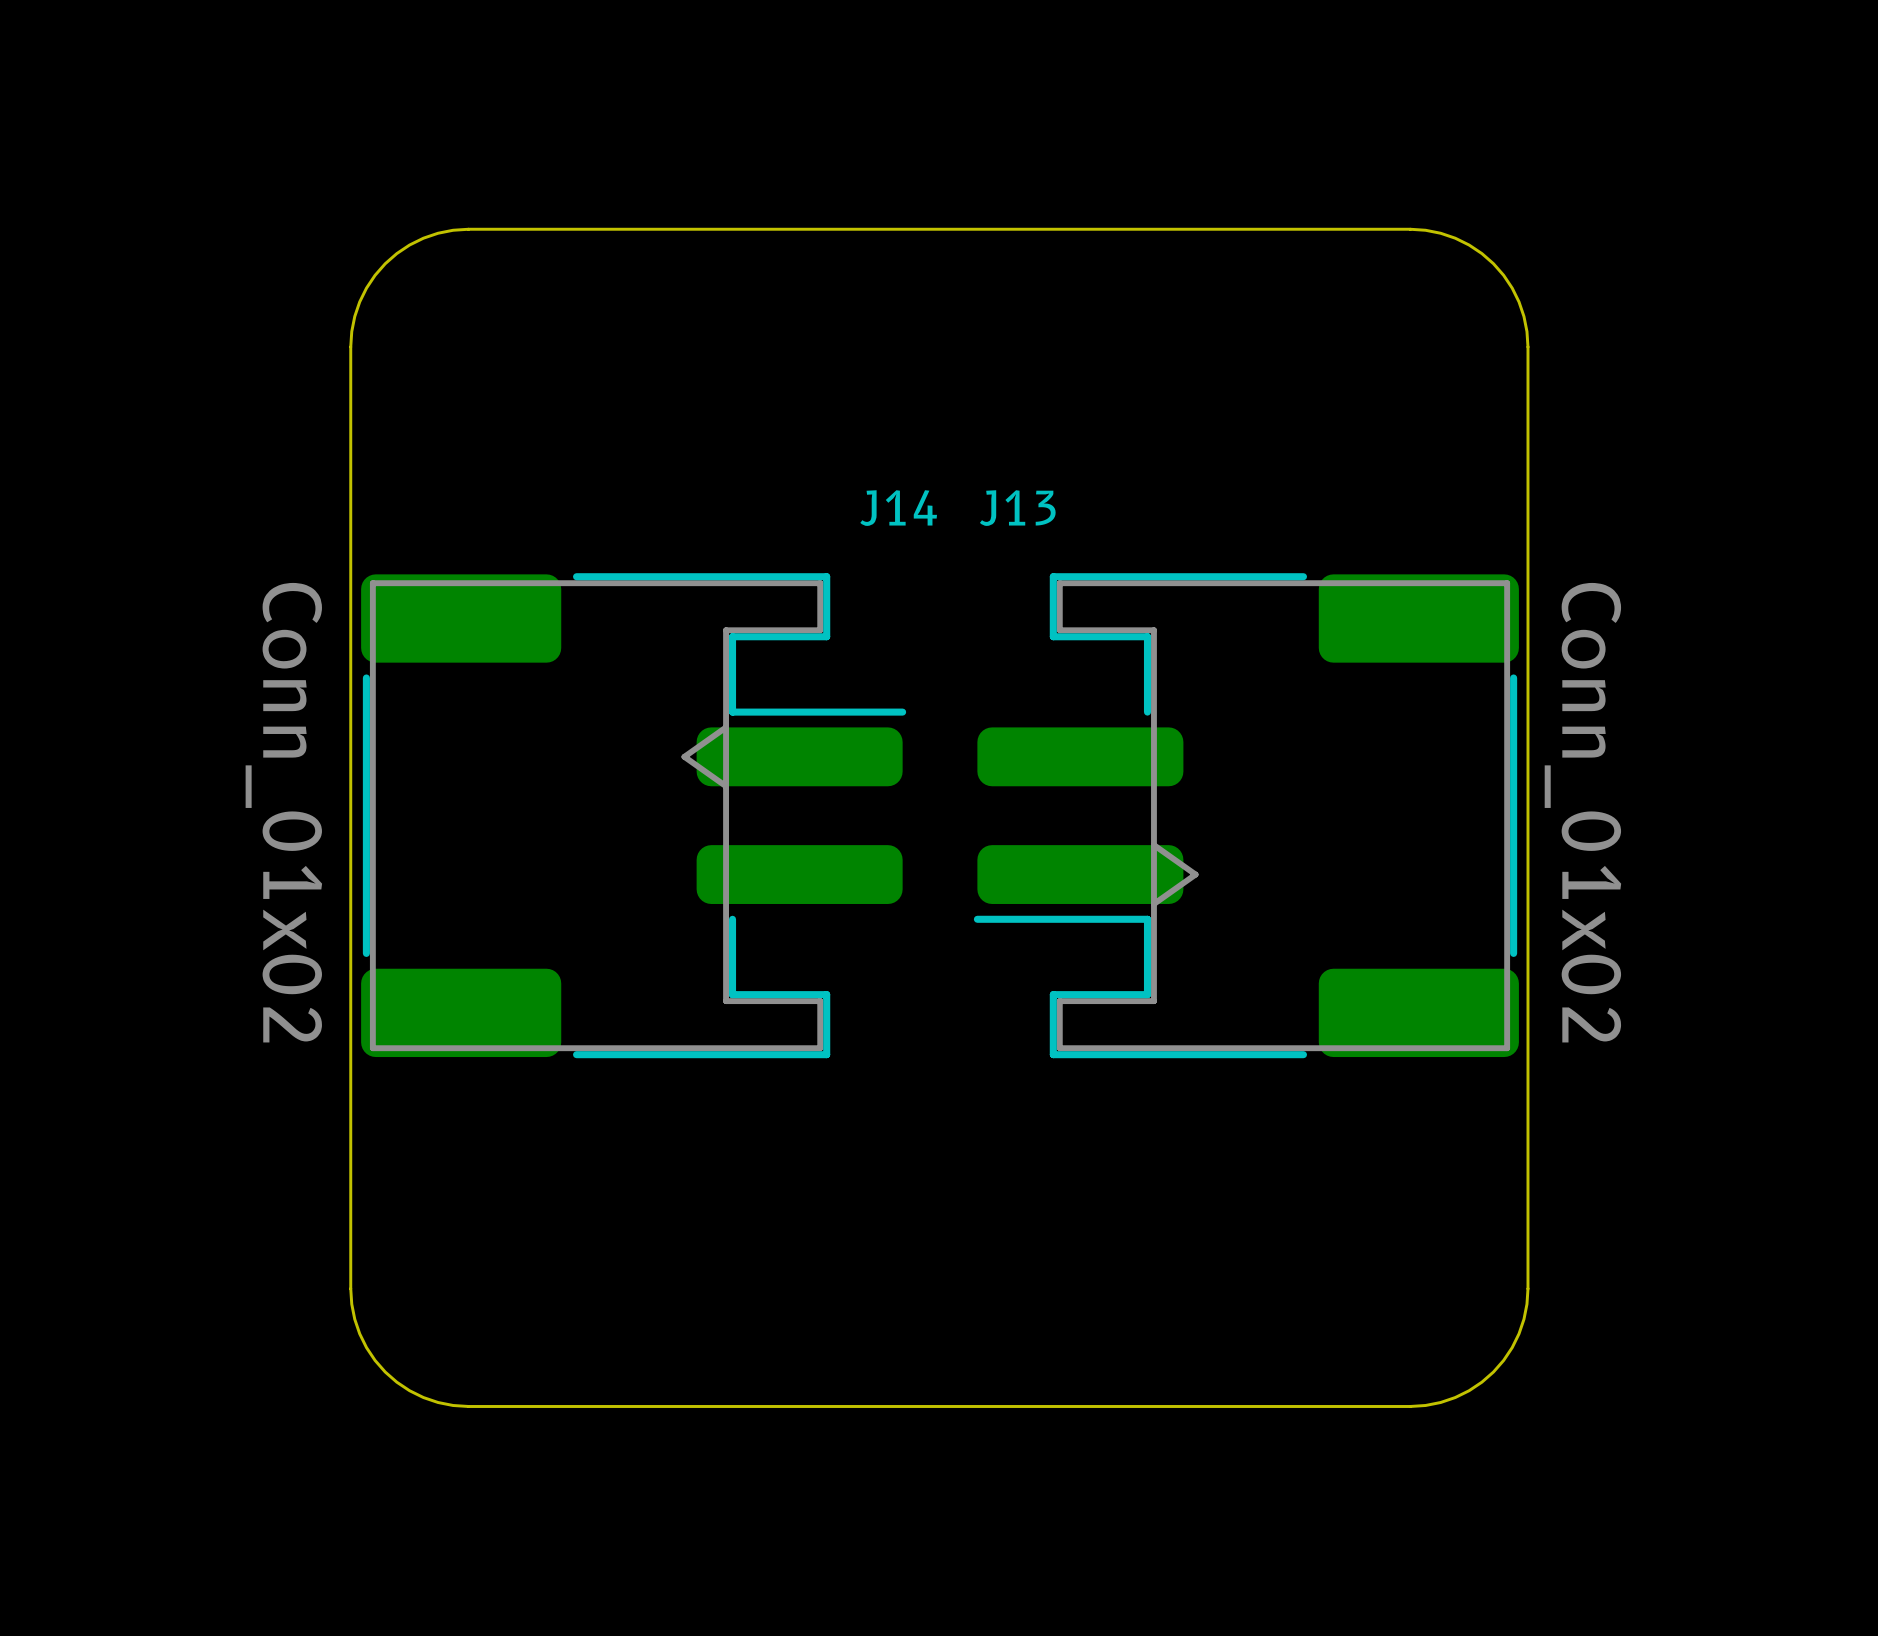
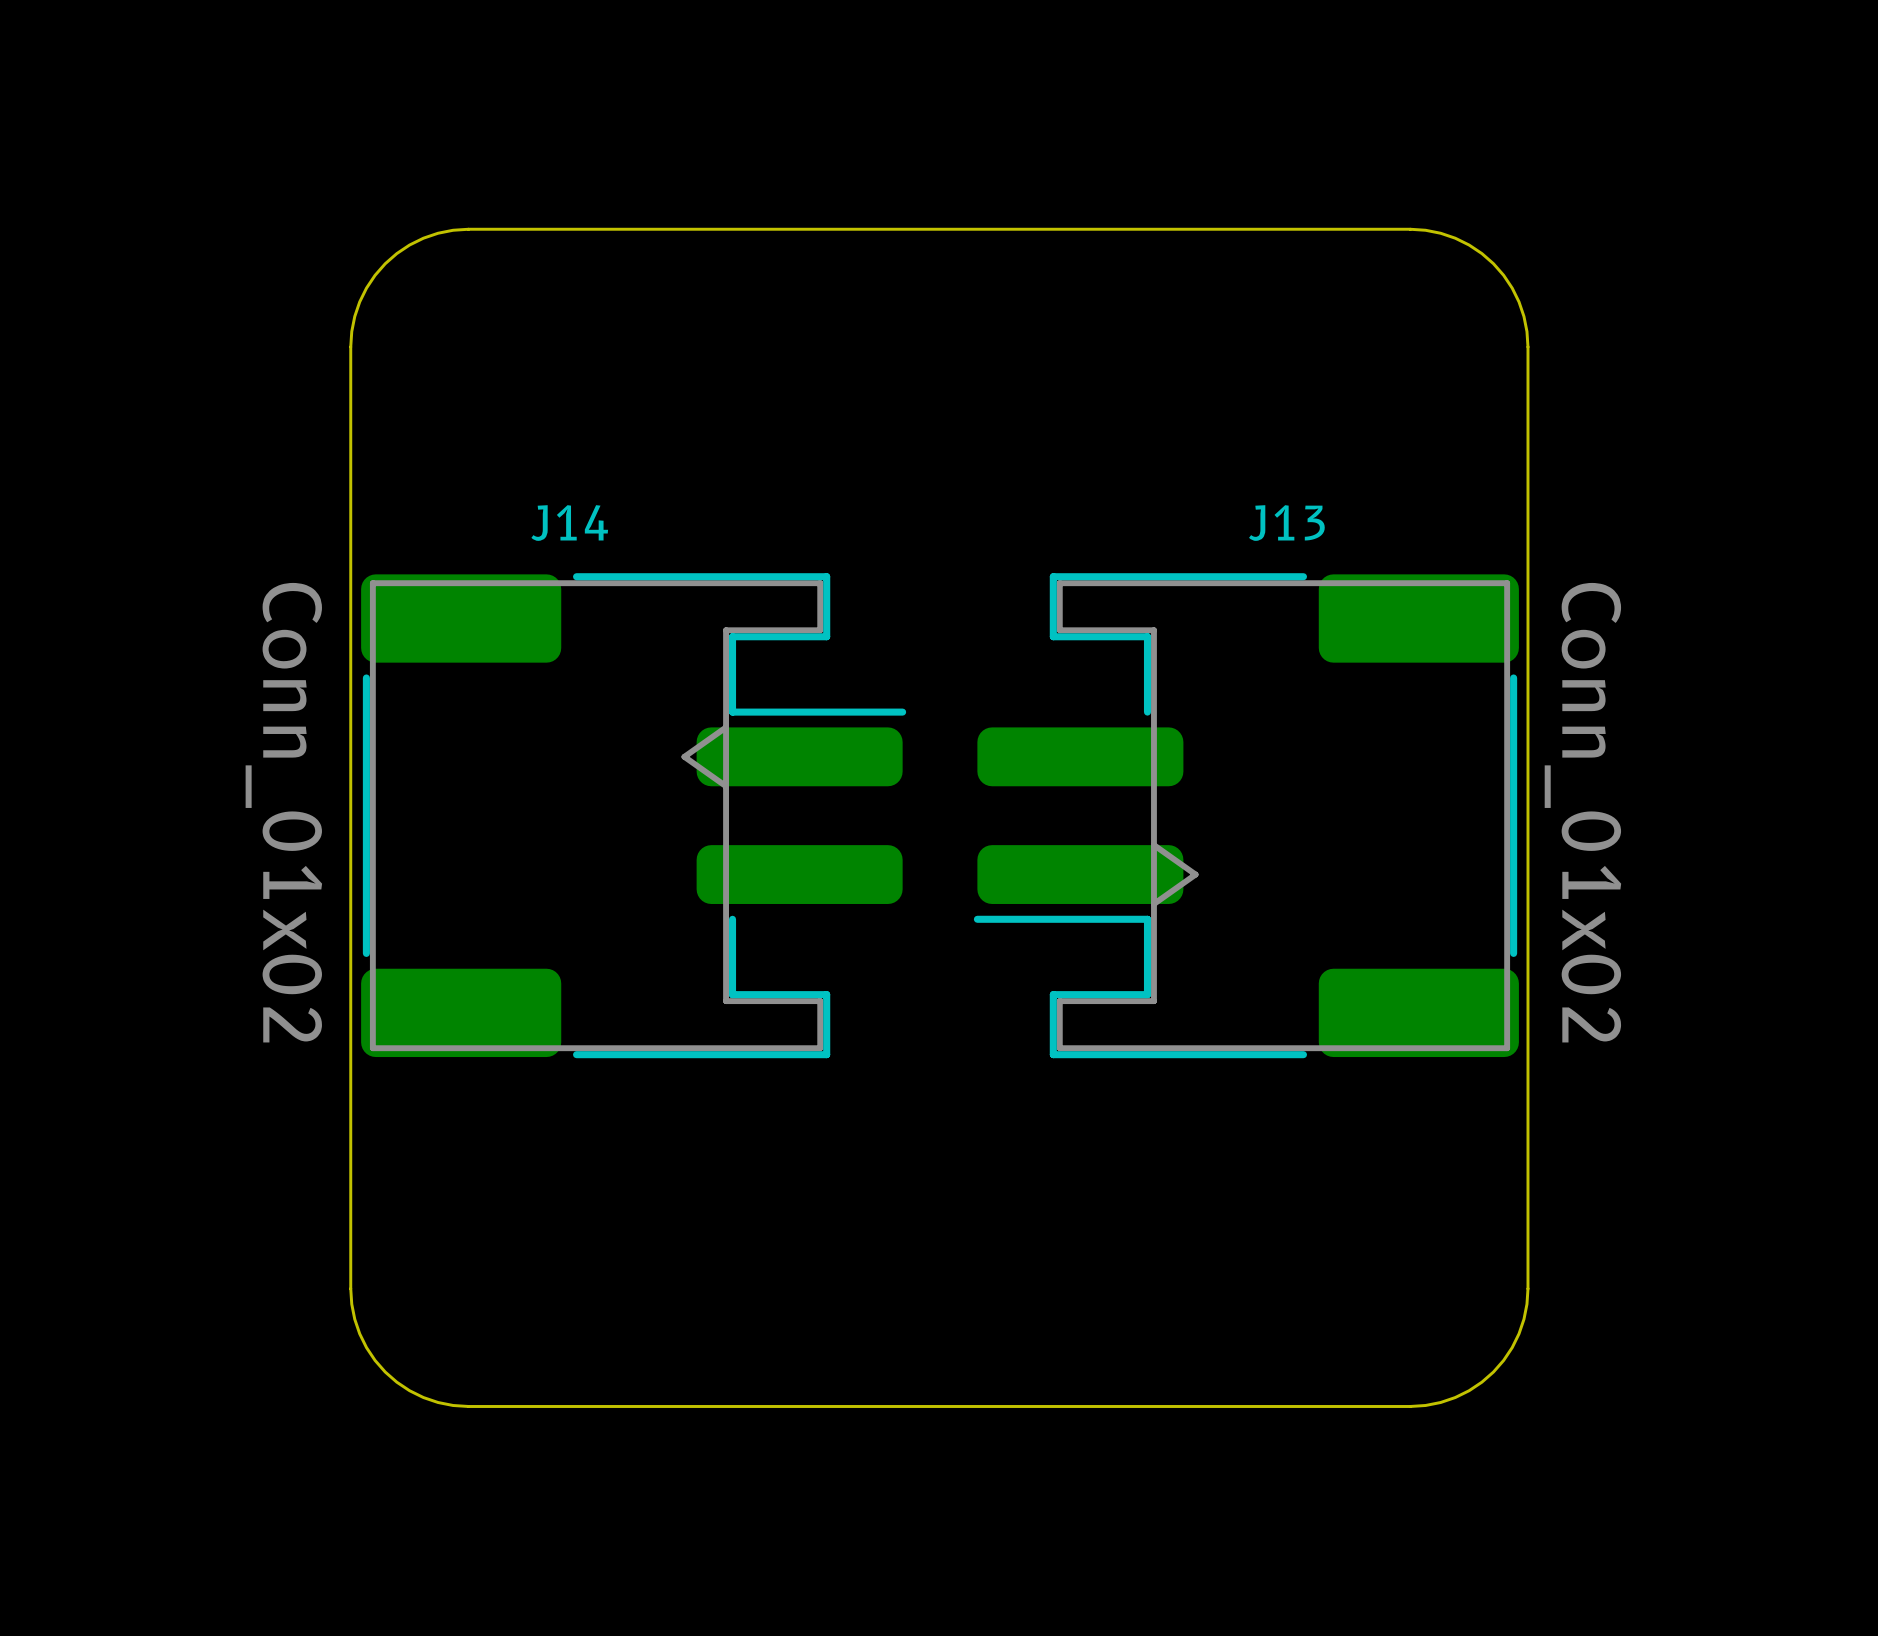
J14 name position: J14 (898, 508) -> J14 (569, 523)
J13 name position: J13 (1017, 508) -> J13 (1286, 523)

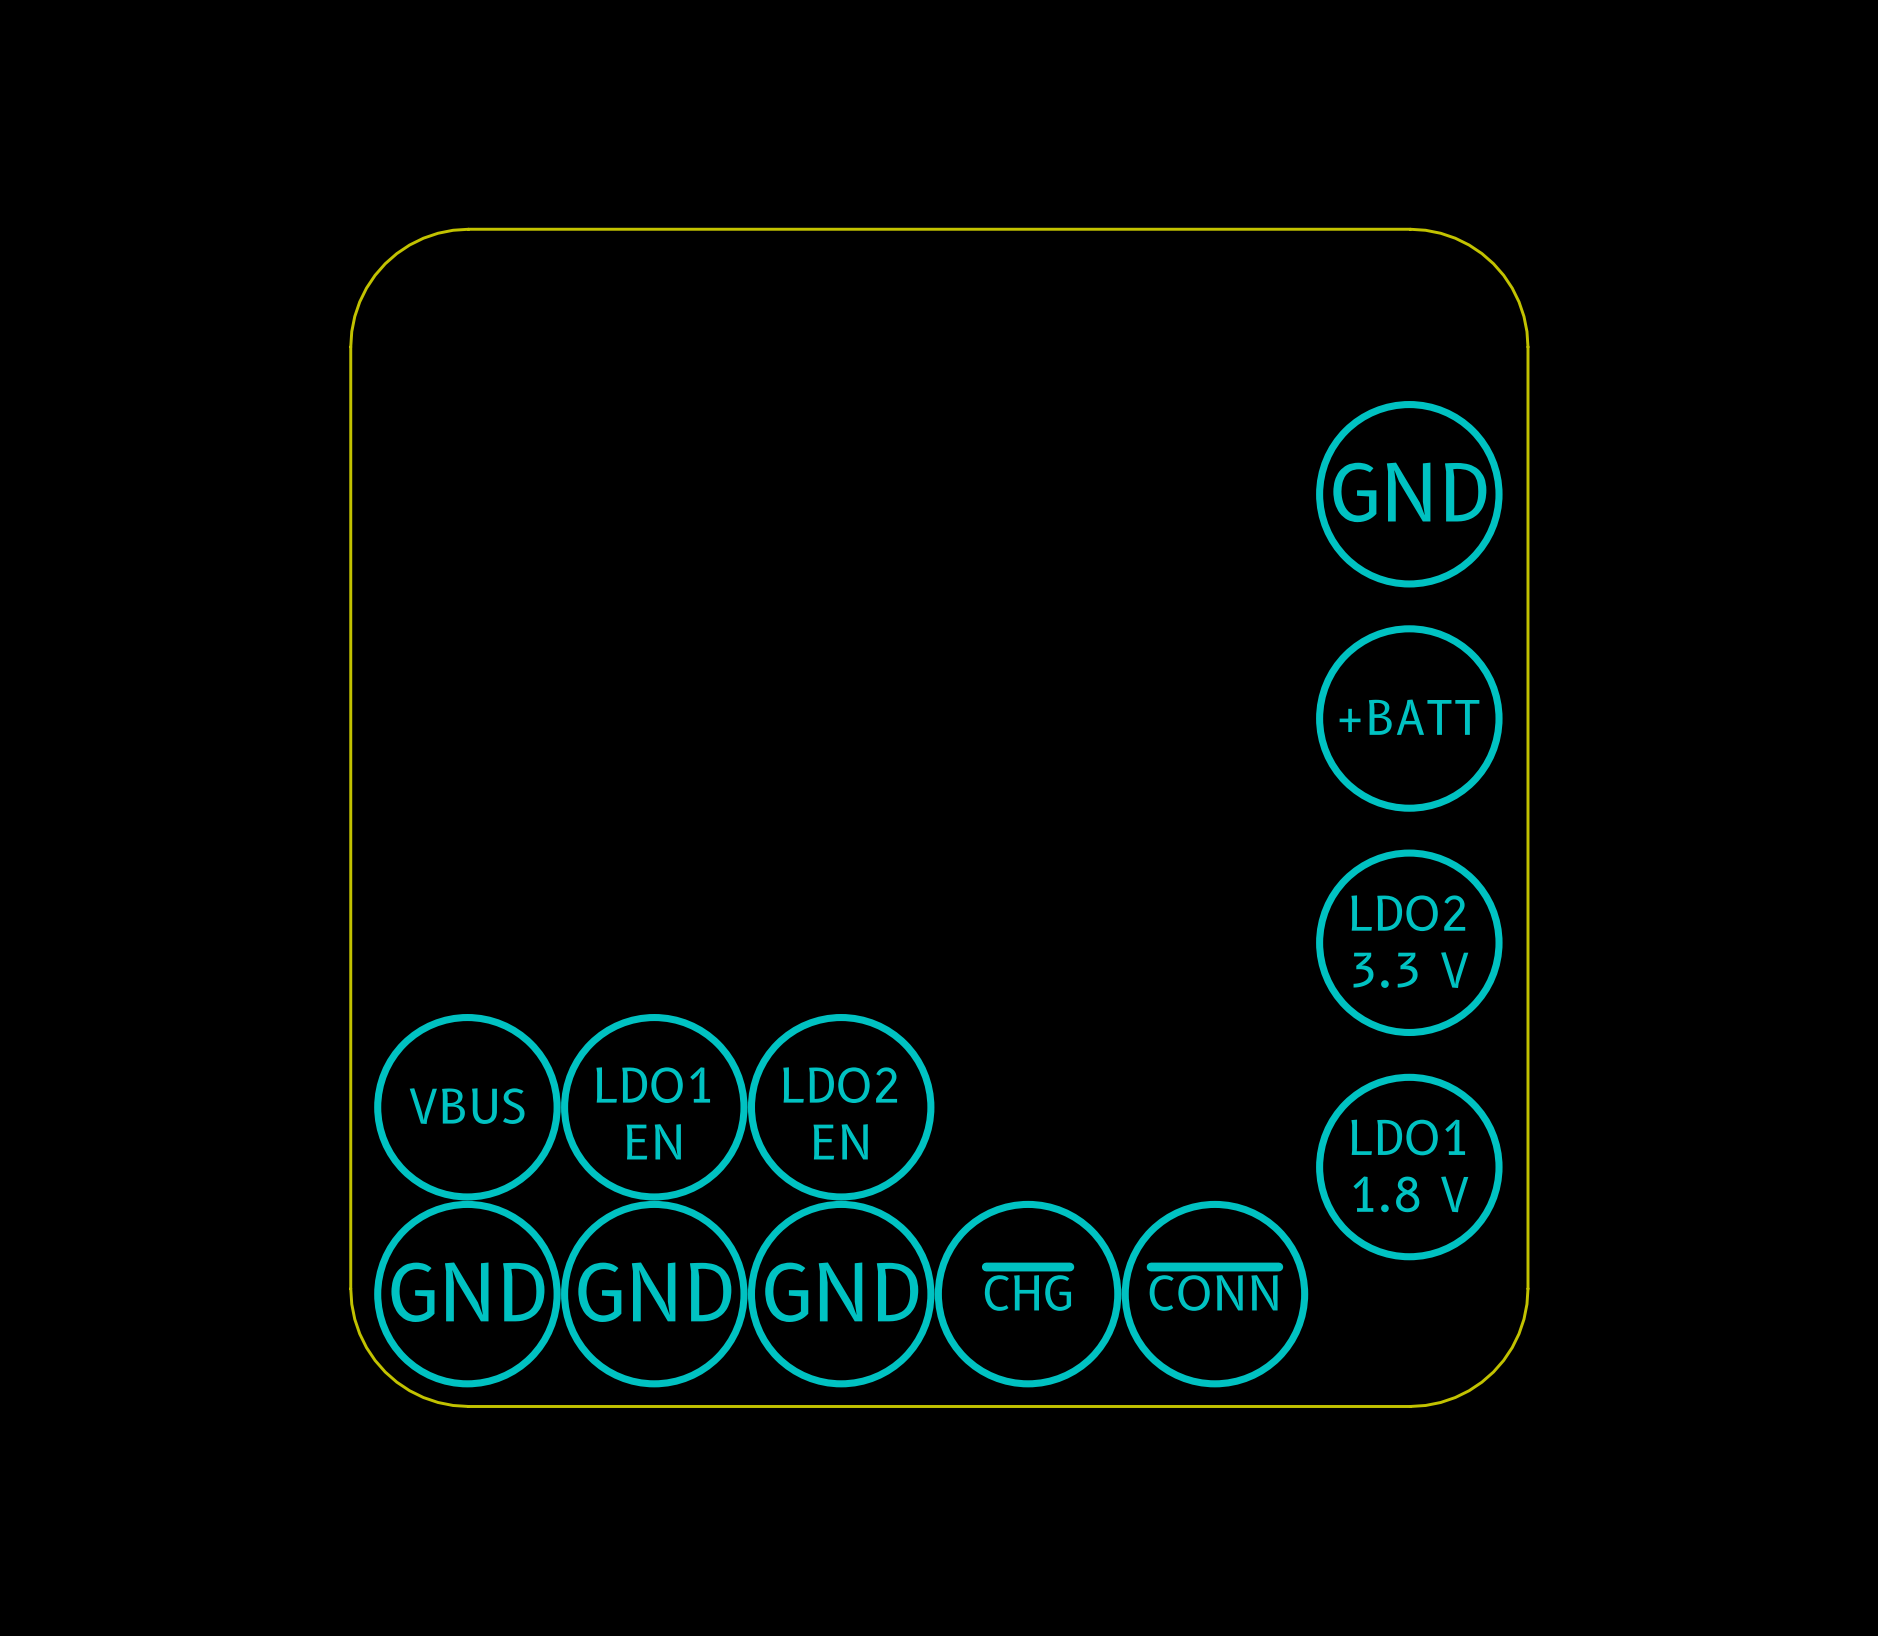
drawing: none -> [374, 401, 1503, 1388]
text: none -> GND (1409, 492)
text: none -> +BATT (1409, 717)
J14: Conn_01x02 (633, 815) -> none
J13: Conn_01x02 (1246, 815) -> none
text: none -> LDO2 (1408, 913)
text: none -> 3.3 V (1410, 970)
text: none -> LDO1 (653, 1085)
text: none -> LDO2 (840, 1085)
text: none -> VBUS (467, 1106)
text: none -> LDO1 (1408, 1137)
text: none -> EN (653, 1141)
text: none -> EN (840, 1141)
text: none -> 1.8 V (1410, 1194)
text: none -> ~{CHG} (1027, 1288)
text: none -> ~{CONN} (1214, 1288)
text: none -> GND (467, 1292)
text: none -> GND (654, 1292)
text: none -> GND (841, 1292)

